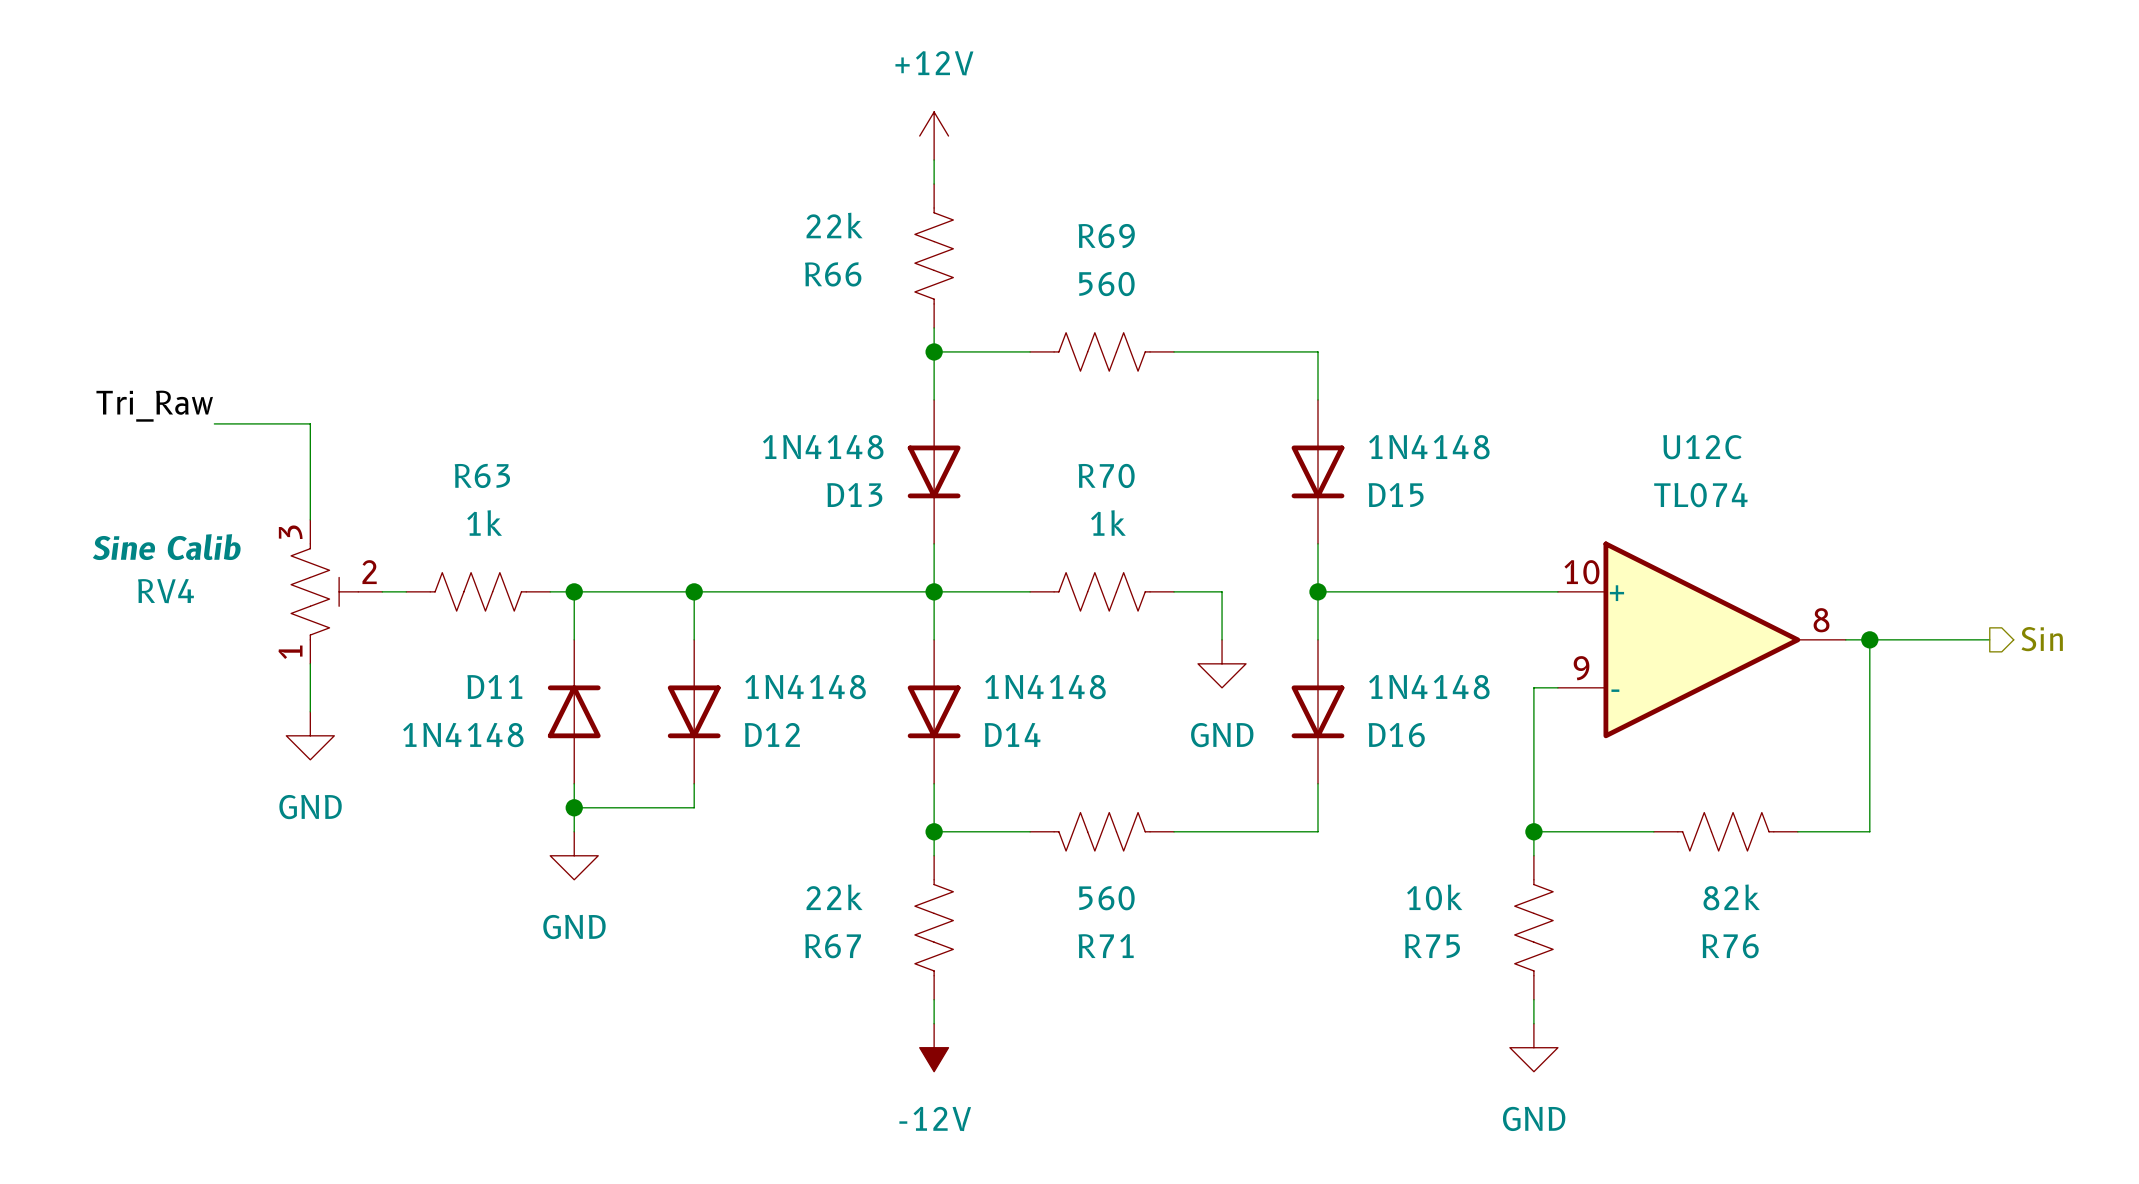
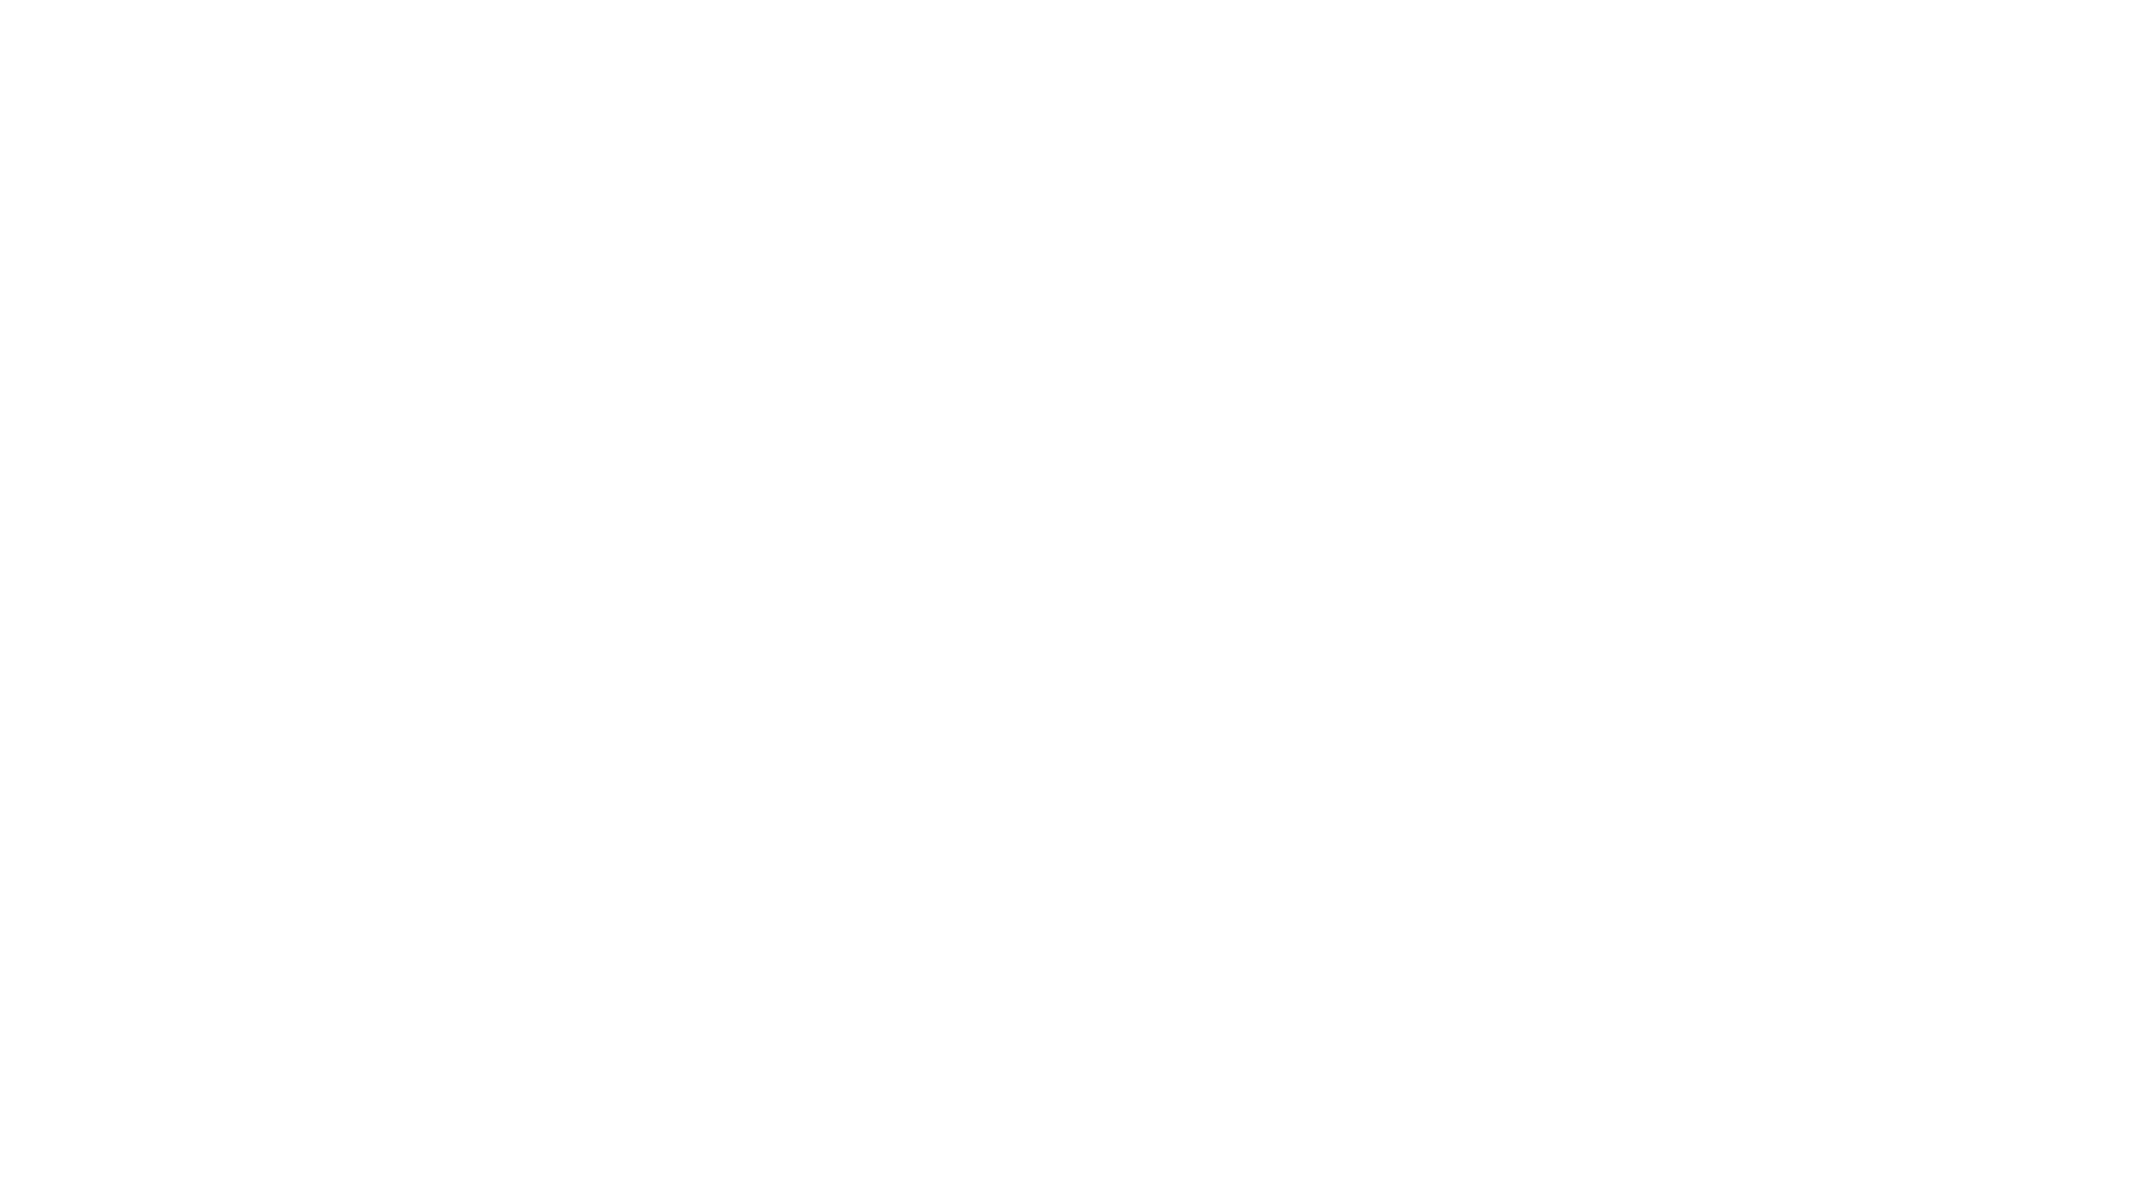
power symbol: +12V (934, 136) -> none
wire: (934, 160) (934, 184) -> none
R66: 22k (934, 255) -> none
wire: (934, 327) (934, 399) -> none
wire: (934, 351) (1030, 351) -> none
junction: (934, 351) -> none
R69: 560 (1102, 351) -> none
wire: (1174, 351) (1317, 351) (1317, 399) -> none
label: Tri_Raw (154, 406) -> none
wire: (214, 423) (310, 423) (310, 519) -> none
D13: 1N4148 (934, 471) -> none
D15: 1N4148 (1317, 471) -> none
wire: (934, 543) (934, 639) -> none
wire: (1317, 543) (1317, 639) -> none
RV4: (336, 591) -> none
wire: (382, 591) (406, 591) -> none
R63: 1k (478, 591) -> none
wire: (550, 591) (1030, 591) -> none
wire: (574, 591) (574, 639) -> none
junction: (574, 591) -> none
wire: (694, 591) (694, 639) -> none
junction: (694, 591) -> none
junction: (934, 591) -> none
R70: 1k (1102, 591) -> none
wire: (1174, 591) (1222, 591) (1222, 639) -> none
wire: (1317, 591) (1557, 591) -> none
junction: (1317, 591) -> none
U12C: TL074 (1701, 639) -> none
wire: (1845, 639) (1989, 639) -> none
wire: (1869, 639) (1869, 831) (1797, 831) -> none
junction: (1869, 639) -> none
hierarchical label: Sin (2042, 639) -> none
wire: (310, 663) (310, 711) -> none
power symbol: GND (1222, 663) -> none
wire: (1557, 687) (1533, 687) (1533, 855) -> none
D11: 1N4148 (574, 711) -> none
D12: 1N4148 (694, 711) -> none
D14: 1N4148 (934, 711) -> none
D16: 1N4148 (1317, 711) -> none
power symbol: GND (310, 735) -> none
wire: (574, 783) (574, 831) -> none
wire: (694, 783) (694, 807) (574, 807) -> none
wire: (934, 783) (934, 855) -> none
wire: (1317, 783) (1317, 831) (1174, 831) -> none
junction: (574, 807) -> none
wire: (934, 831) (1030, 831) -> none
junction: (934, 831) -> none
R71: 560 (1102, 831) -> none
wire: (1533, 831) (1653, 831) -> none
junction: (1533, 831) -> none
R76: 82k (1725, 831) -> none
power symbol: GND (574, 855) -> none
R67: 22k (934, 927) -> none
R75: 10k (1533, 927) -> none
wire: (934, 999) (934, 1023) -> none
wire: (1533, 999) (1533, 1023) -> none
power symbol: -12V (934, 1047) -> none
power symbol: GND (1533, 1047) -> none

